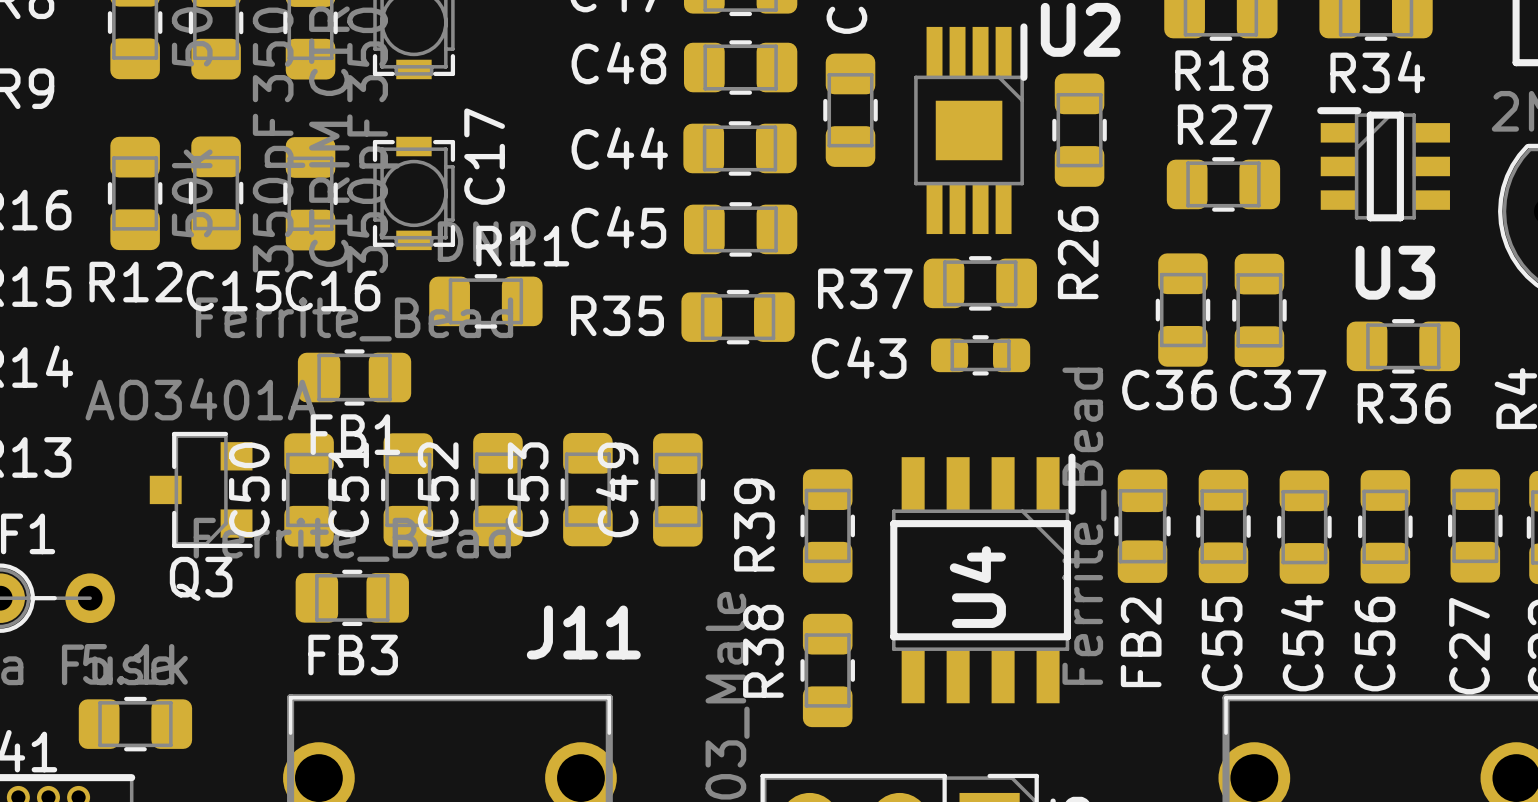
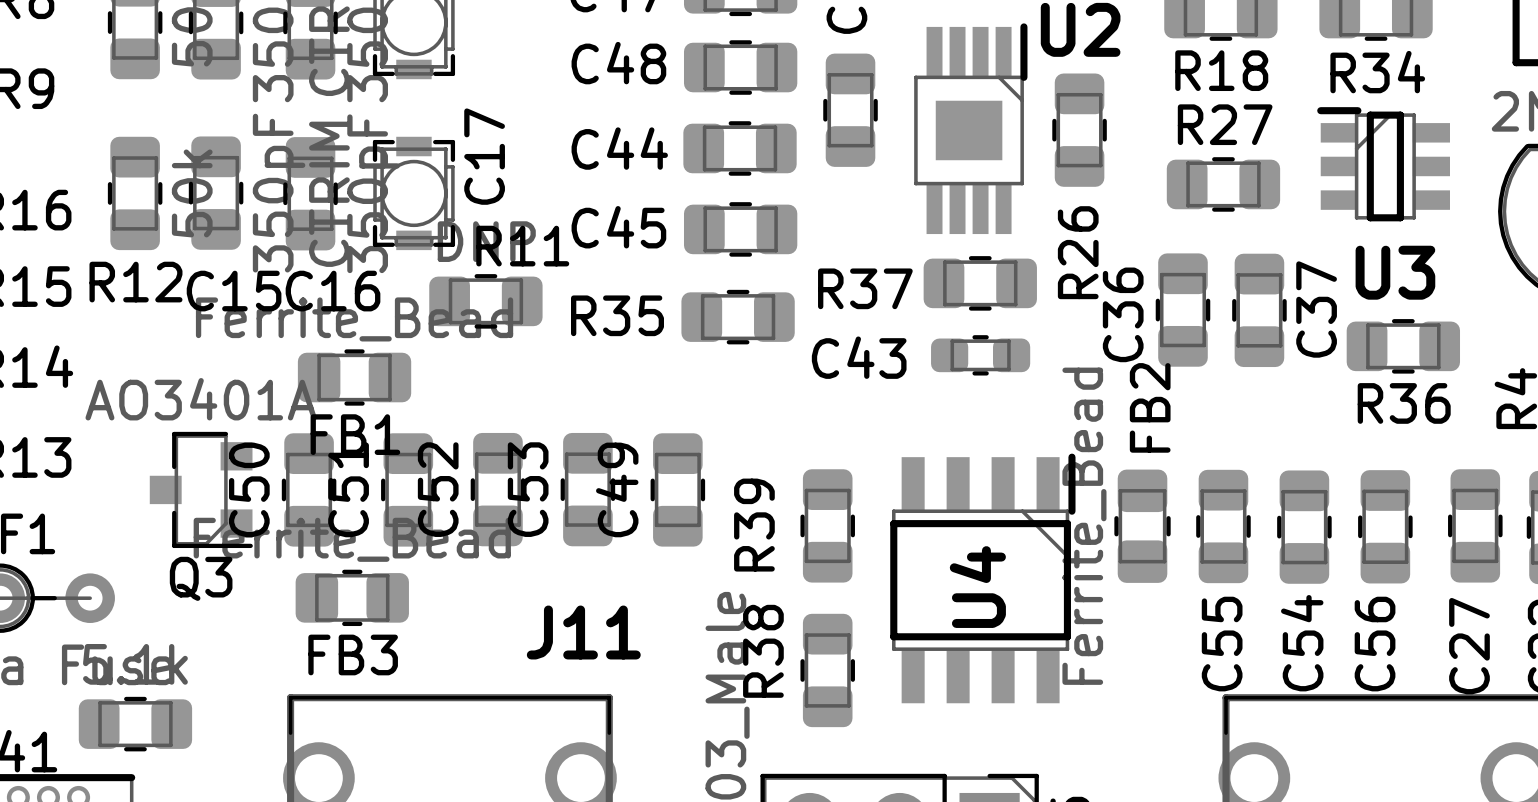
C36 name rotation: 0° (1169, 389) -> 90° counterclockwise (1123, 314)
C37 name rotation: 0° (1278, 389) -> 90° counterclockwise (1316, 309)
FB2 name position: FB2 (1141, 642) -> FB2 (1150, 407)

